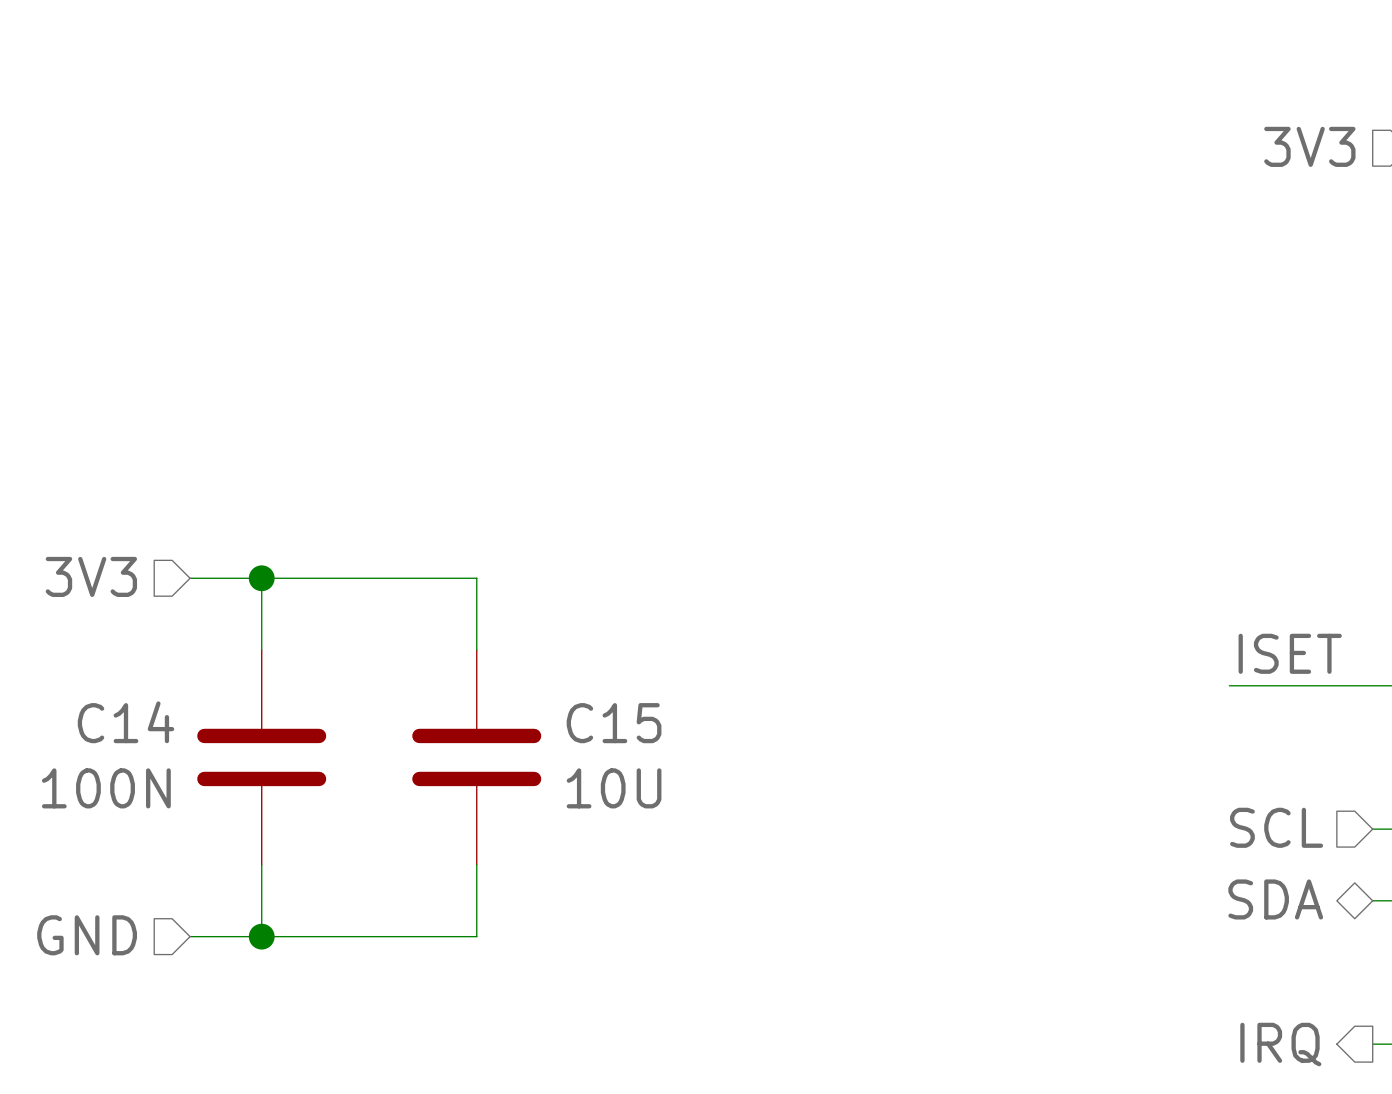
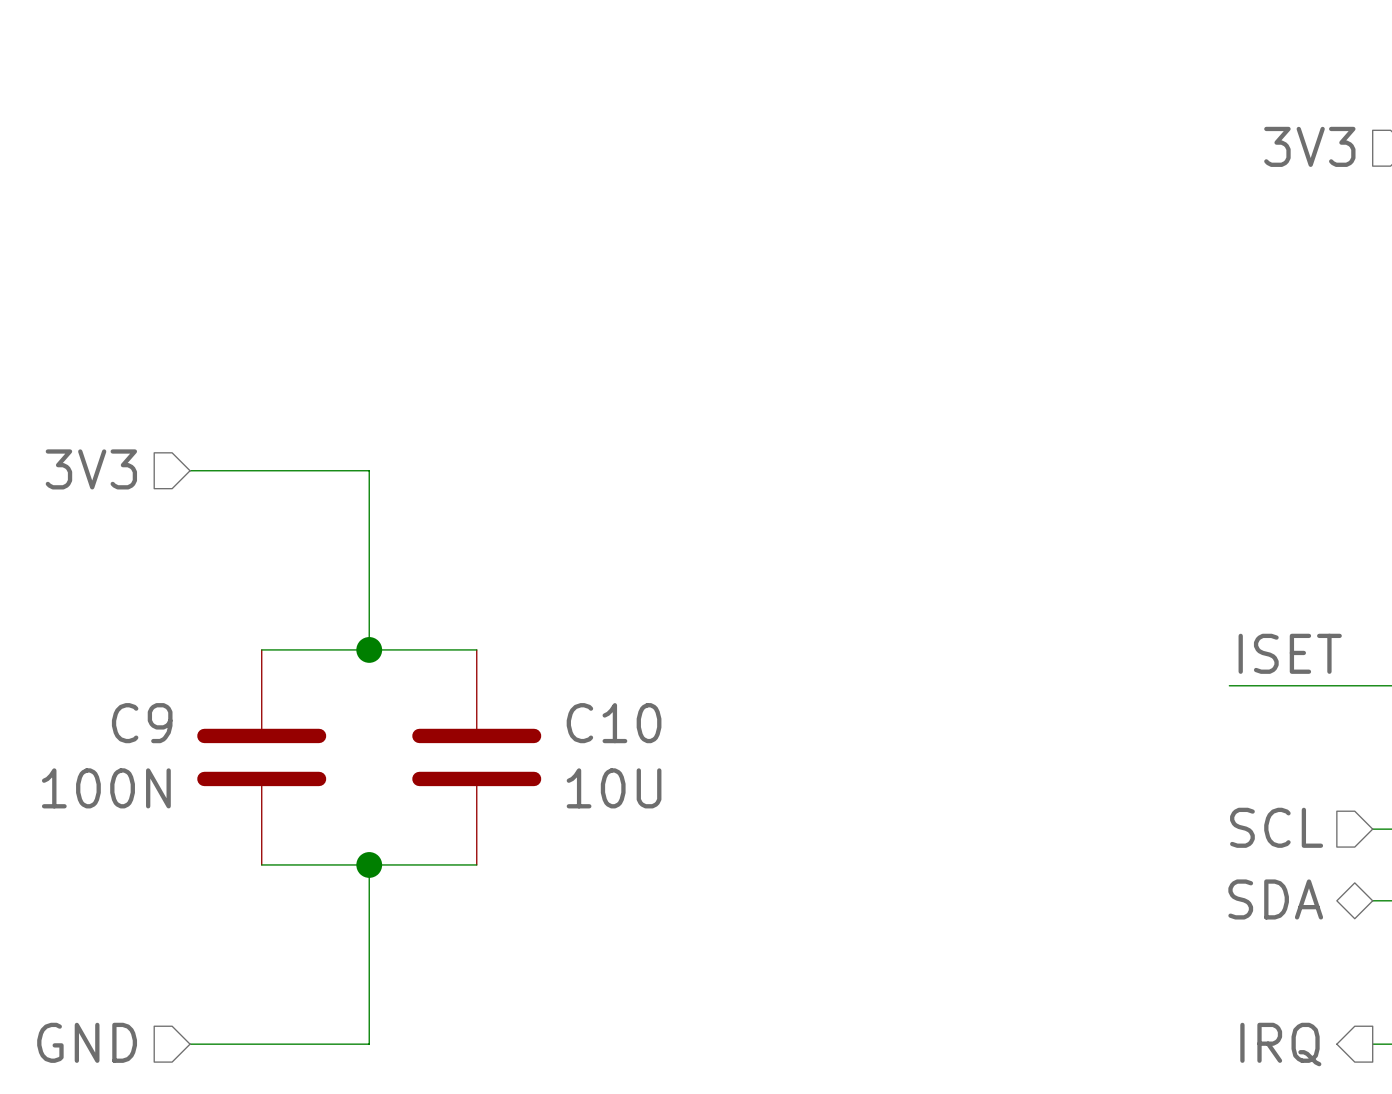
wire: none -> (190, 470) (369, 470) (369, 649)
hierarchical label position: 3V3 (91, 576) -> 3V3 (91, 469)
wire: (190, 578) (476, 578) (476, 649) -> (261, 649) (476, 649)
wire: (261, 578) (261, 649) -> none
junction position: (261, 578) -> (369, 649)
C14 name: C14 (125, 722) -> C9 (142, 723)
C15 name: C15 (614, 723) -> C10 (614, 723)
wire: (261, 864) (261, 936) -> none
wire: none -> (369, 864) (369, 1044) (190, 1044)
wire: (476, 864) (476, 936) (190, 936) -> (476, 864) (261, 864)
hierarchical label position: GND (87, 935) -> GND (87, 1042)
junction position: (261, 936) -> (369, 864)

